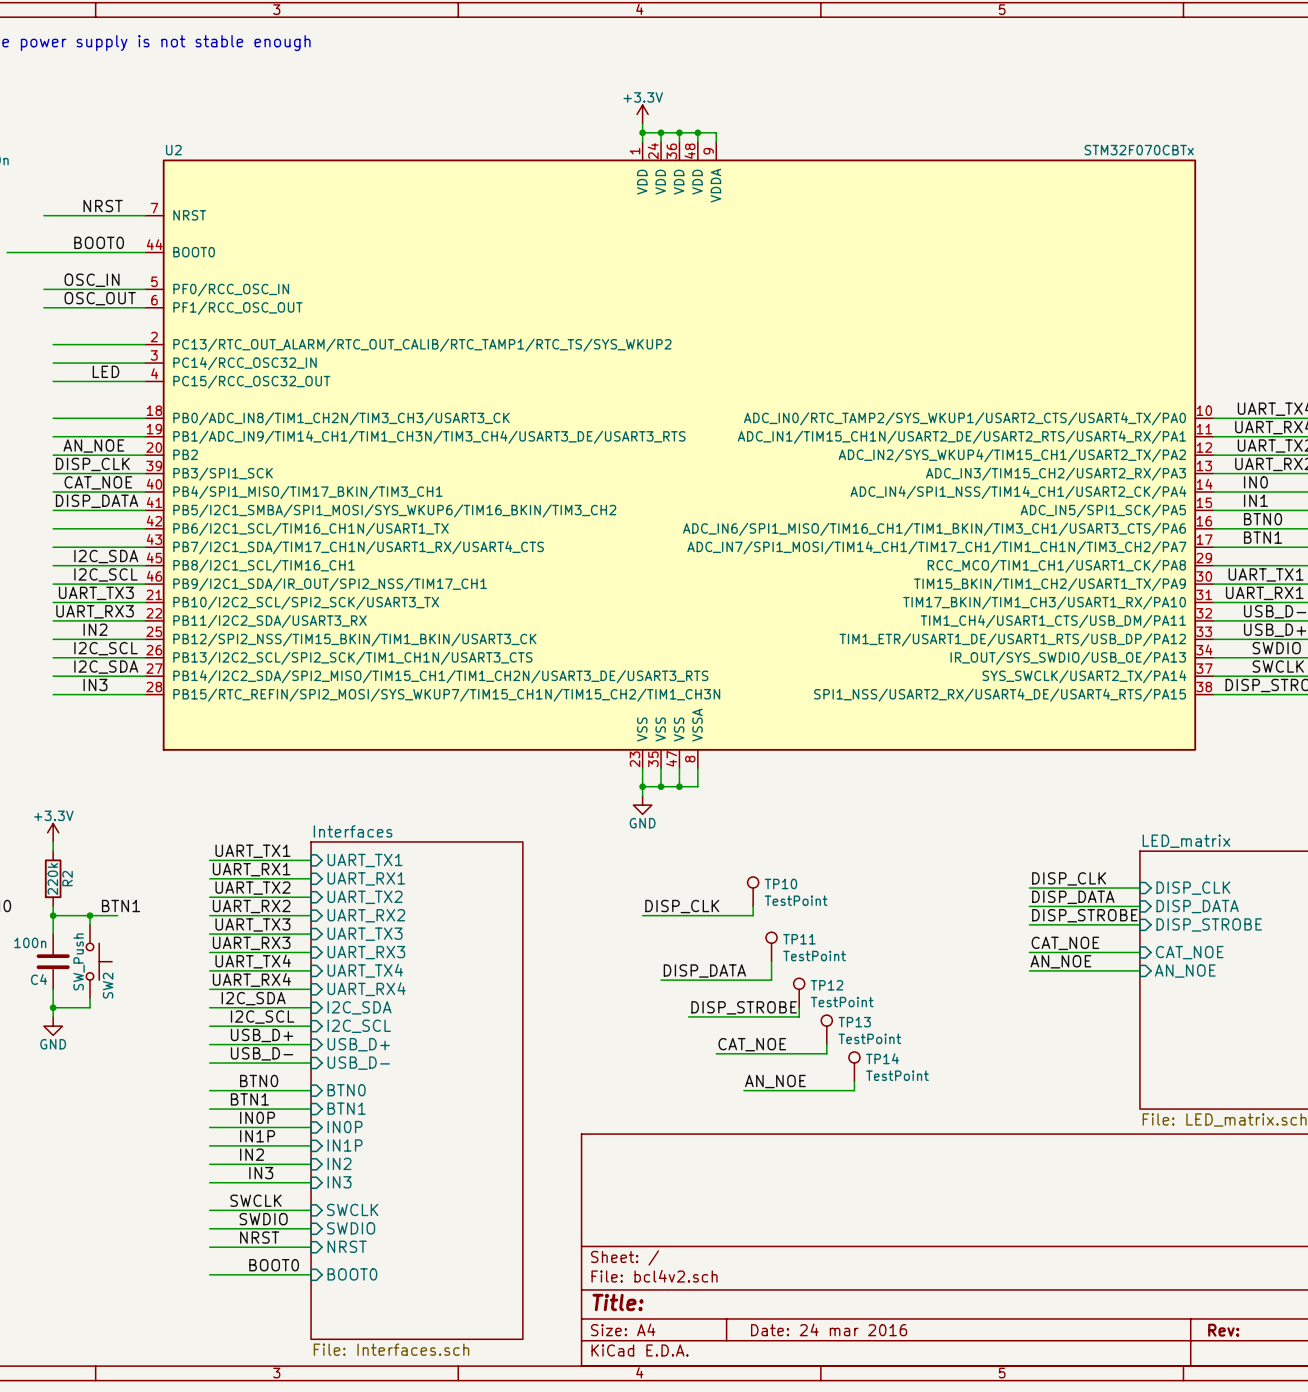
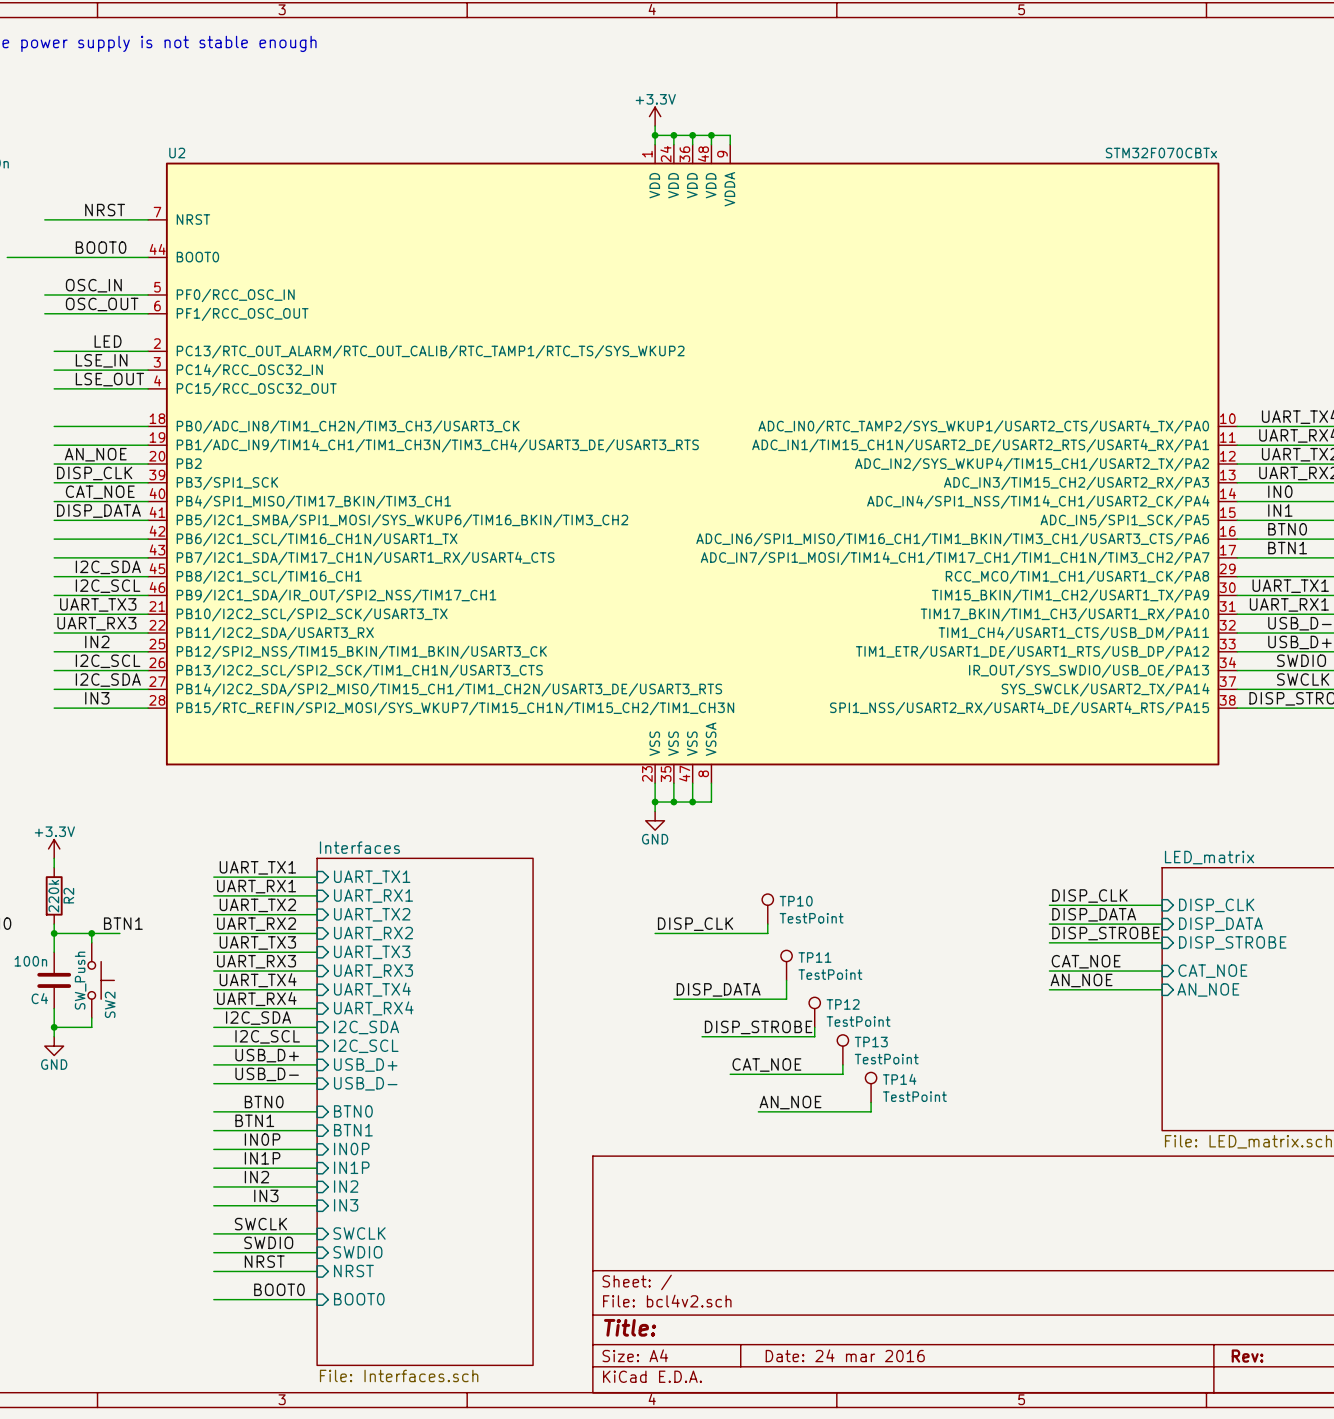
label: none -> LSE_IN (101, 360)
label position: LED (105, 371) -> LED (108, 341)
label: none -> LSE_OUT (109, 379)

